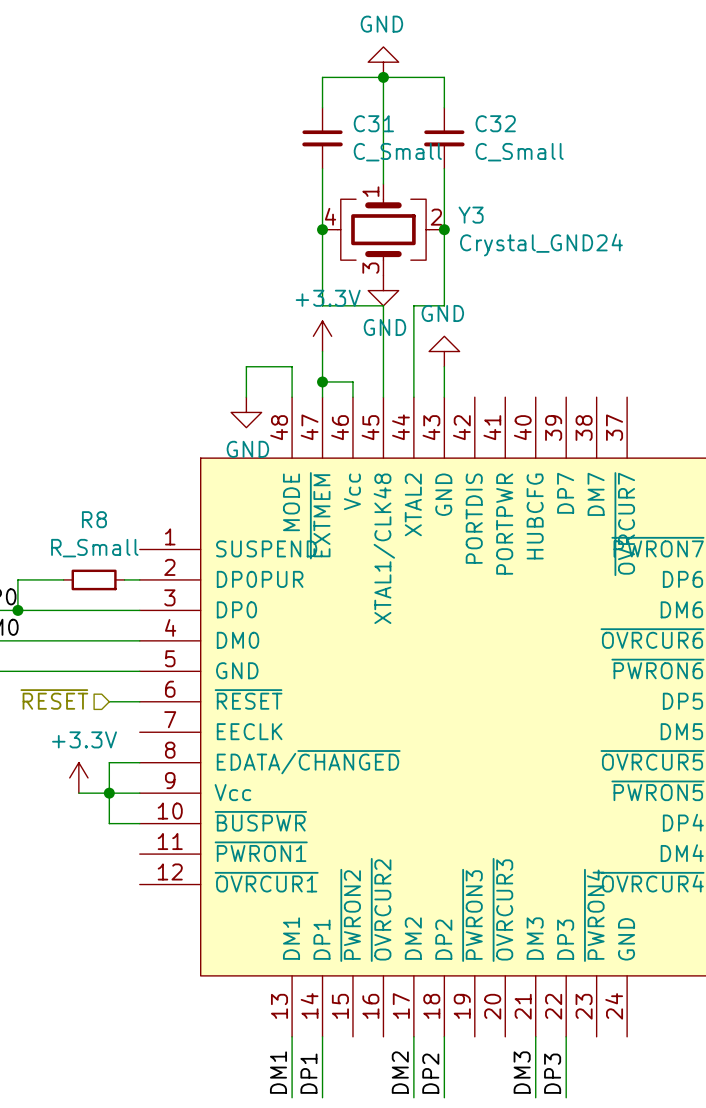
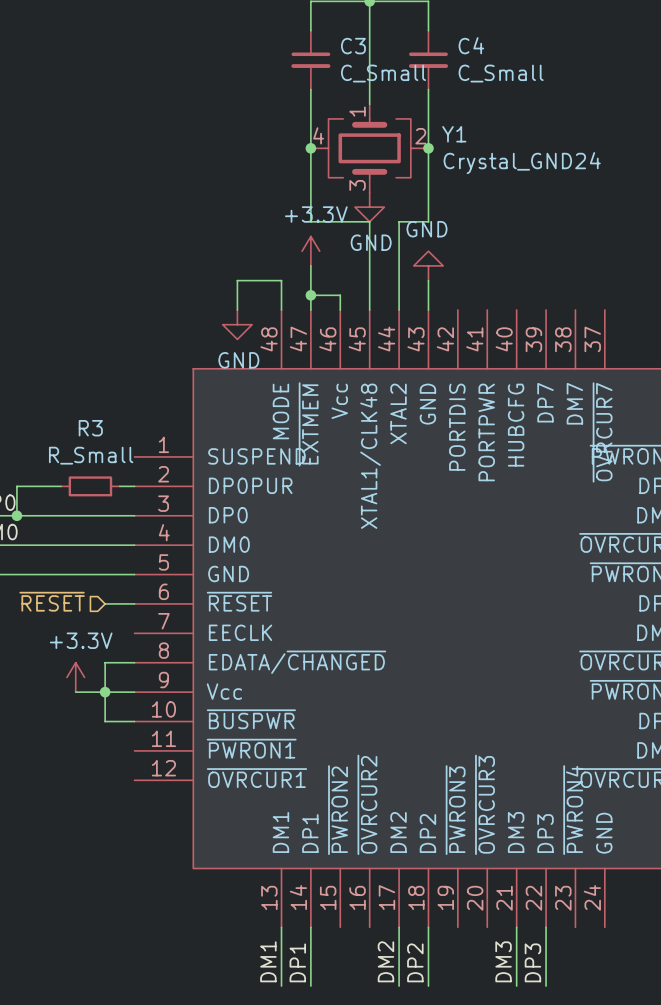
C31 name: C31 (373, 123) -> C3 (353, 46)
C32 name: C32 (495, 123) -> C4 (471, 45)
Y3 name: Y3 (471, 215) -> Y1 (454, 134)
R8 name: R8 (94, 519) -> R3 (90, 428)

